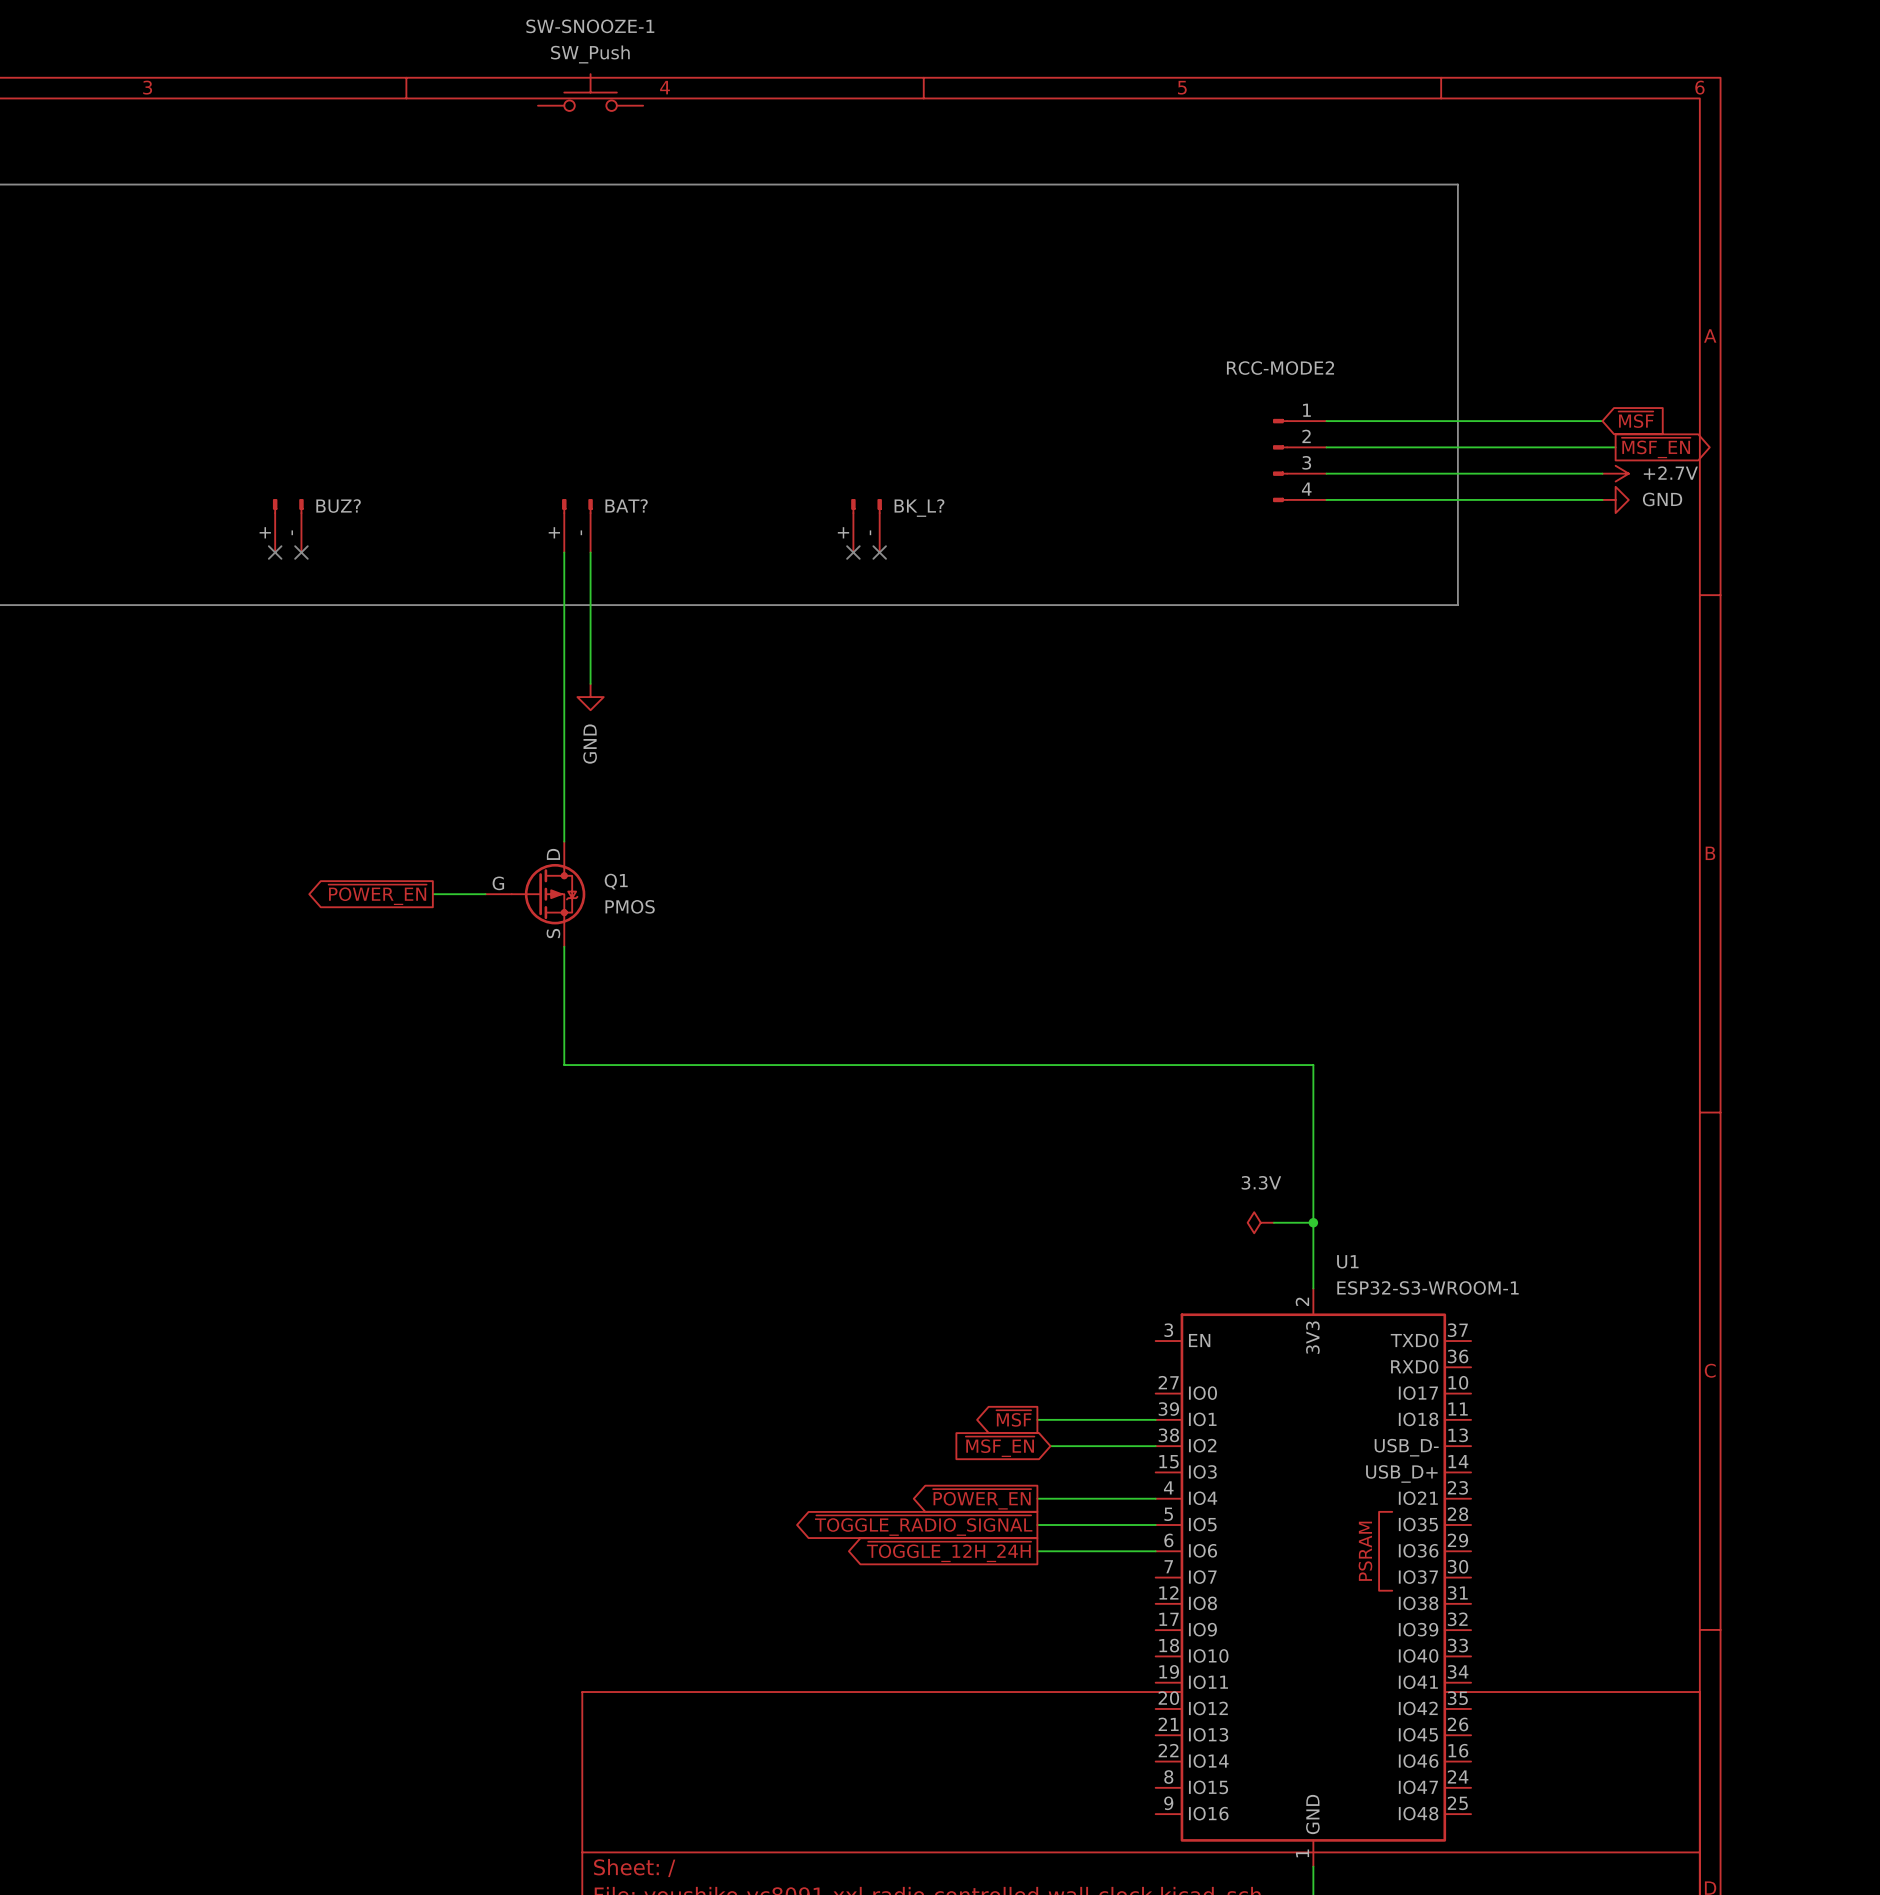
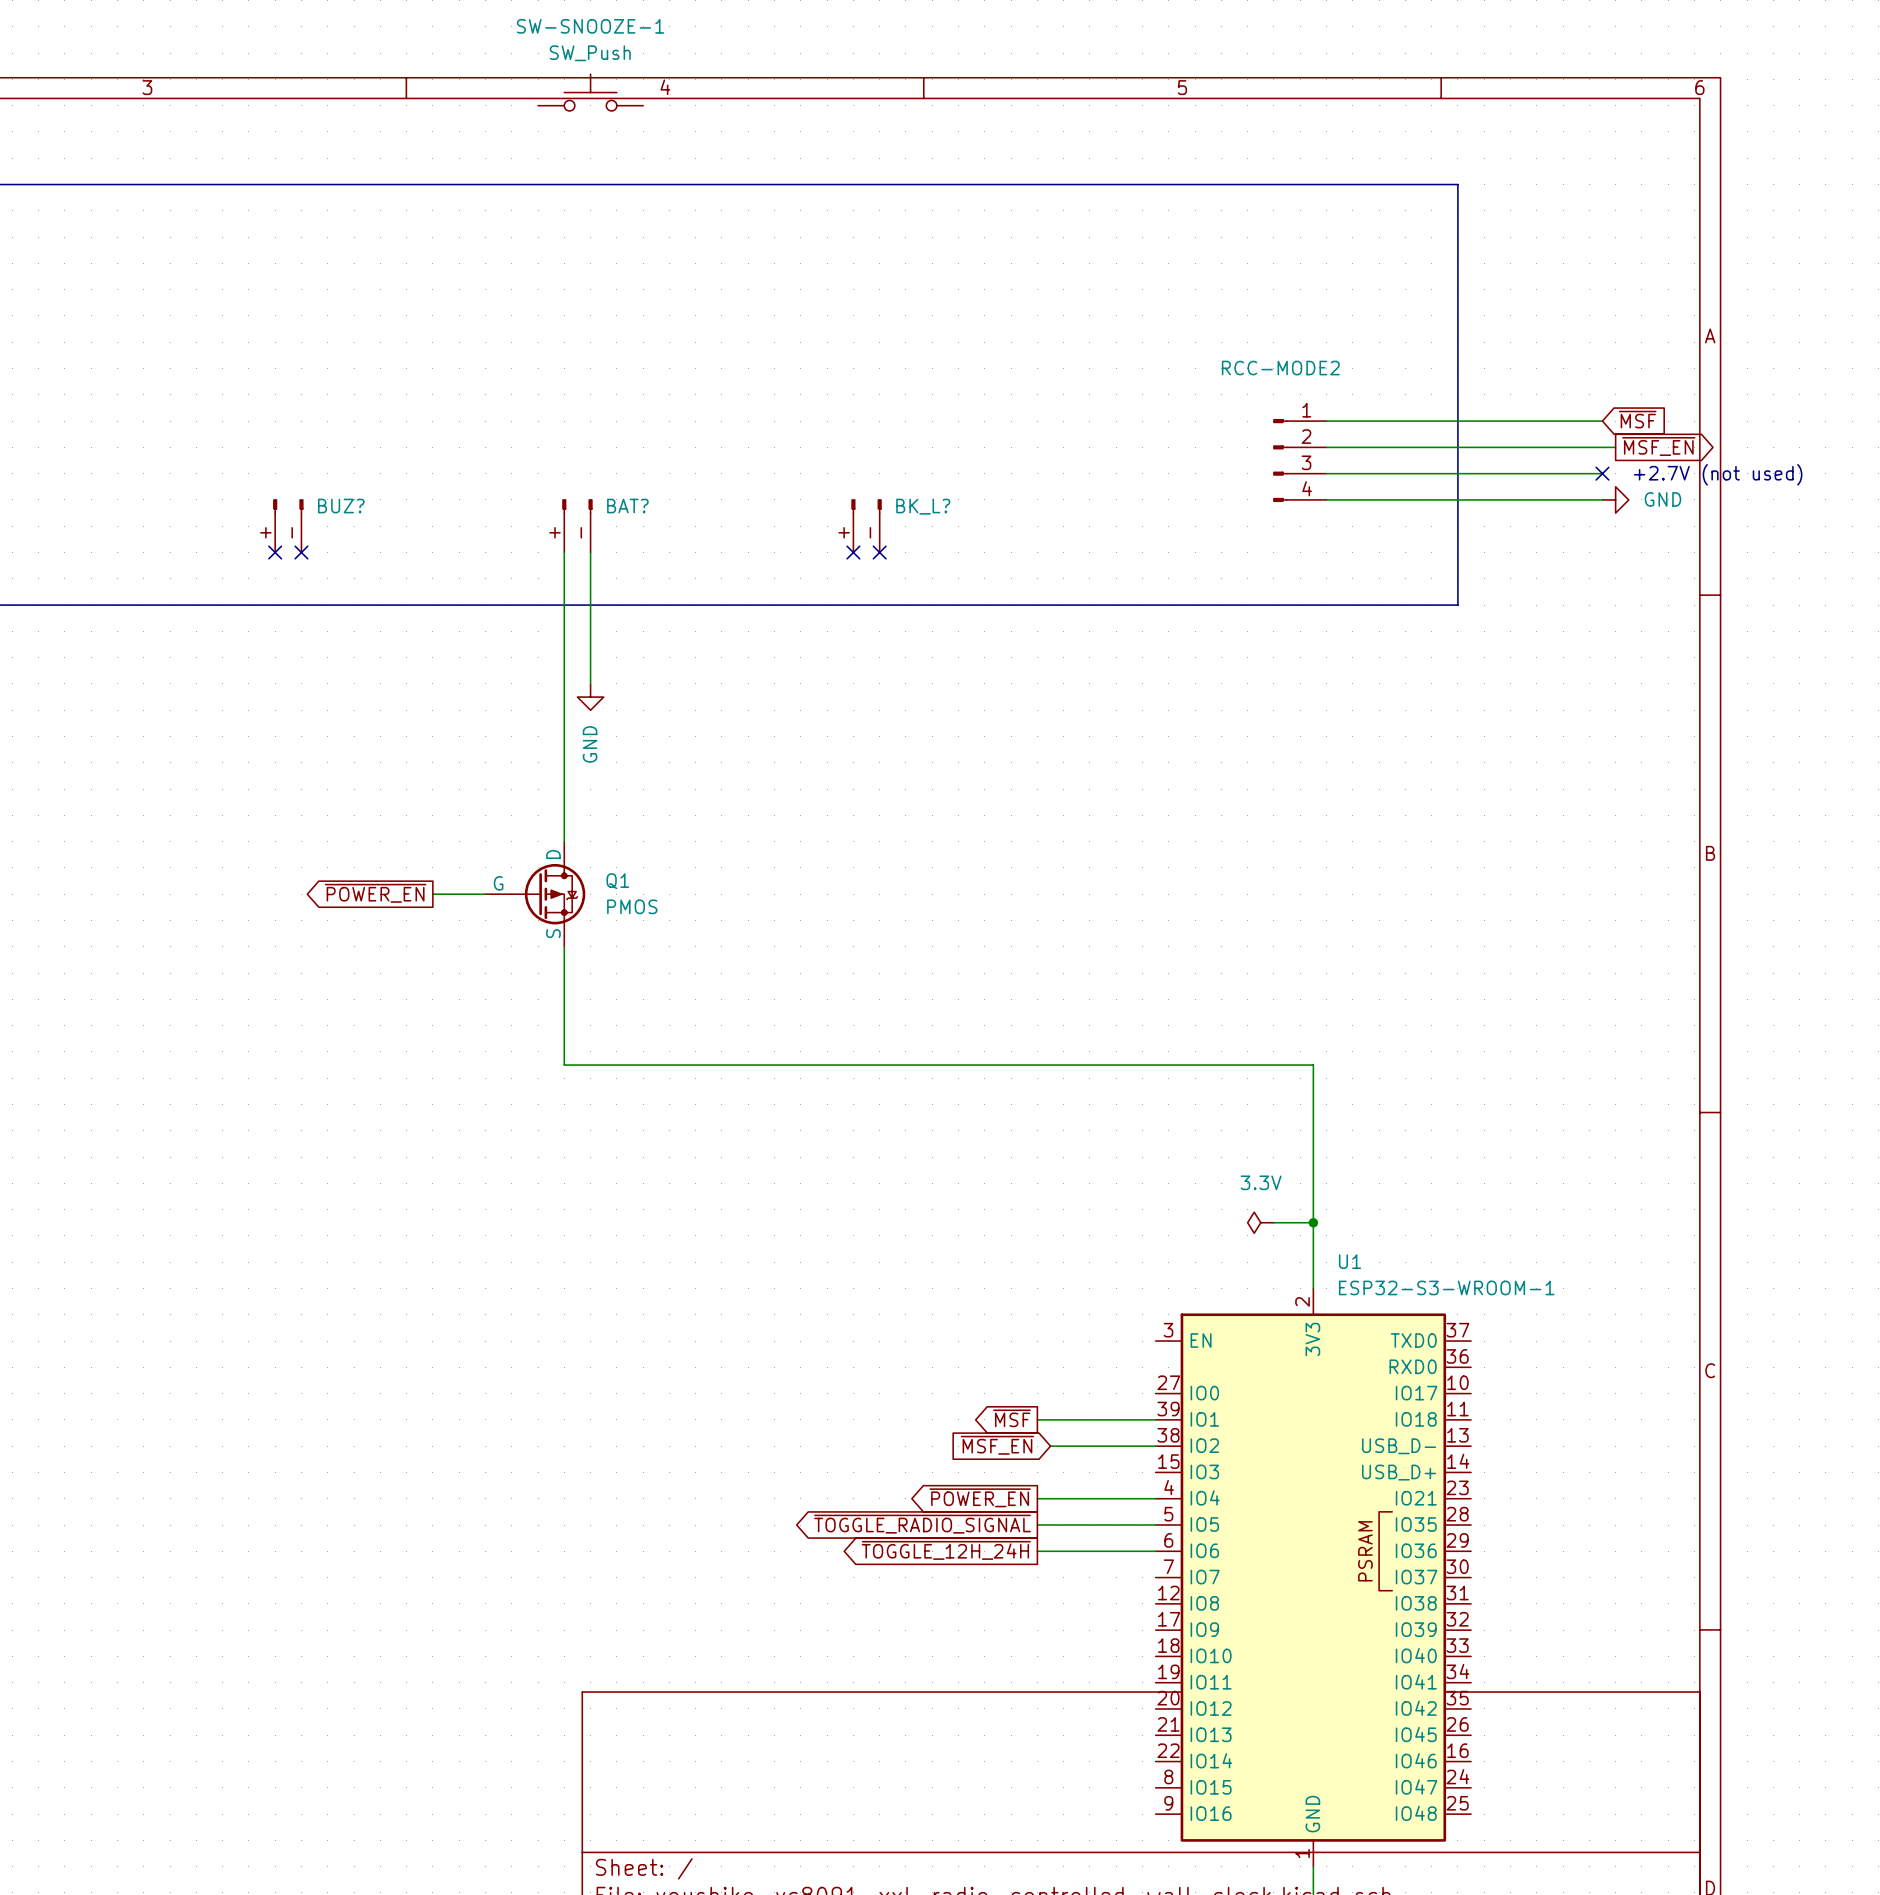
no-connect mark: none -> (1602, 473)
power symbol: +2.7V (1615, 473) -> none
text: none -> +2.7V (not used) (1718, 474)

